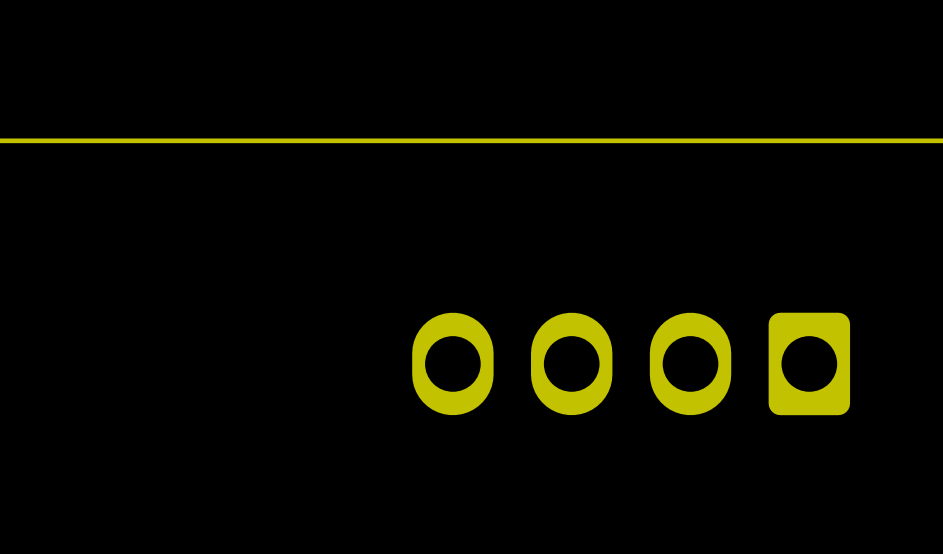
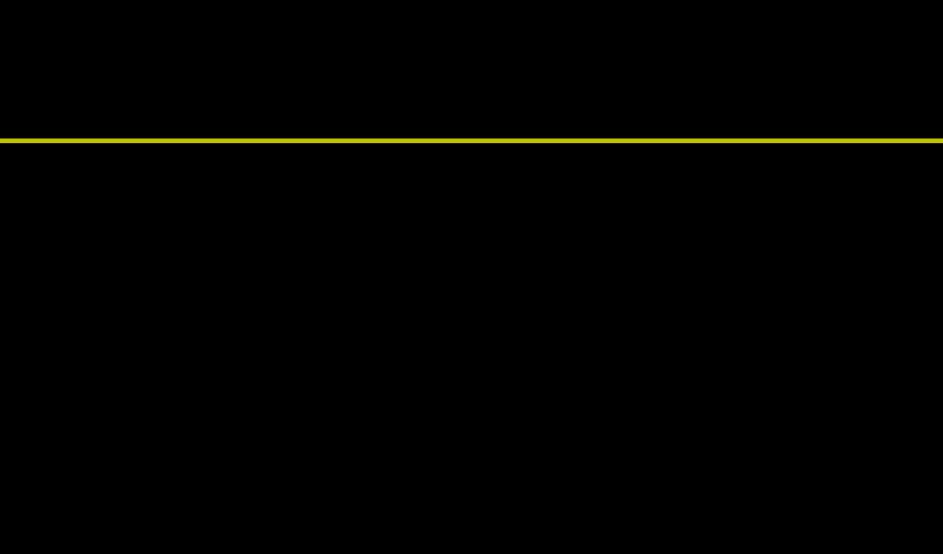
part: (631, 363) -> none

